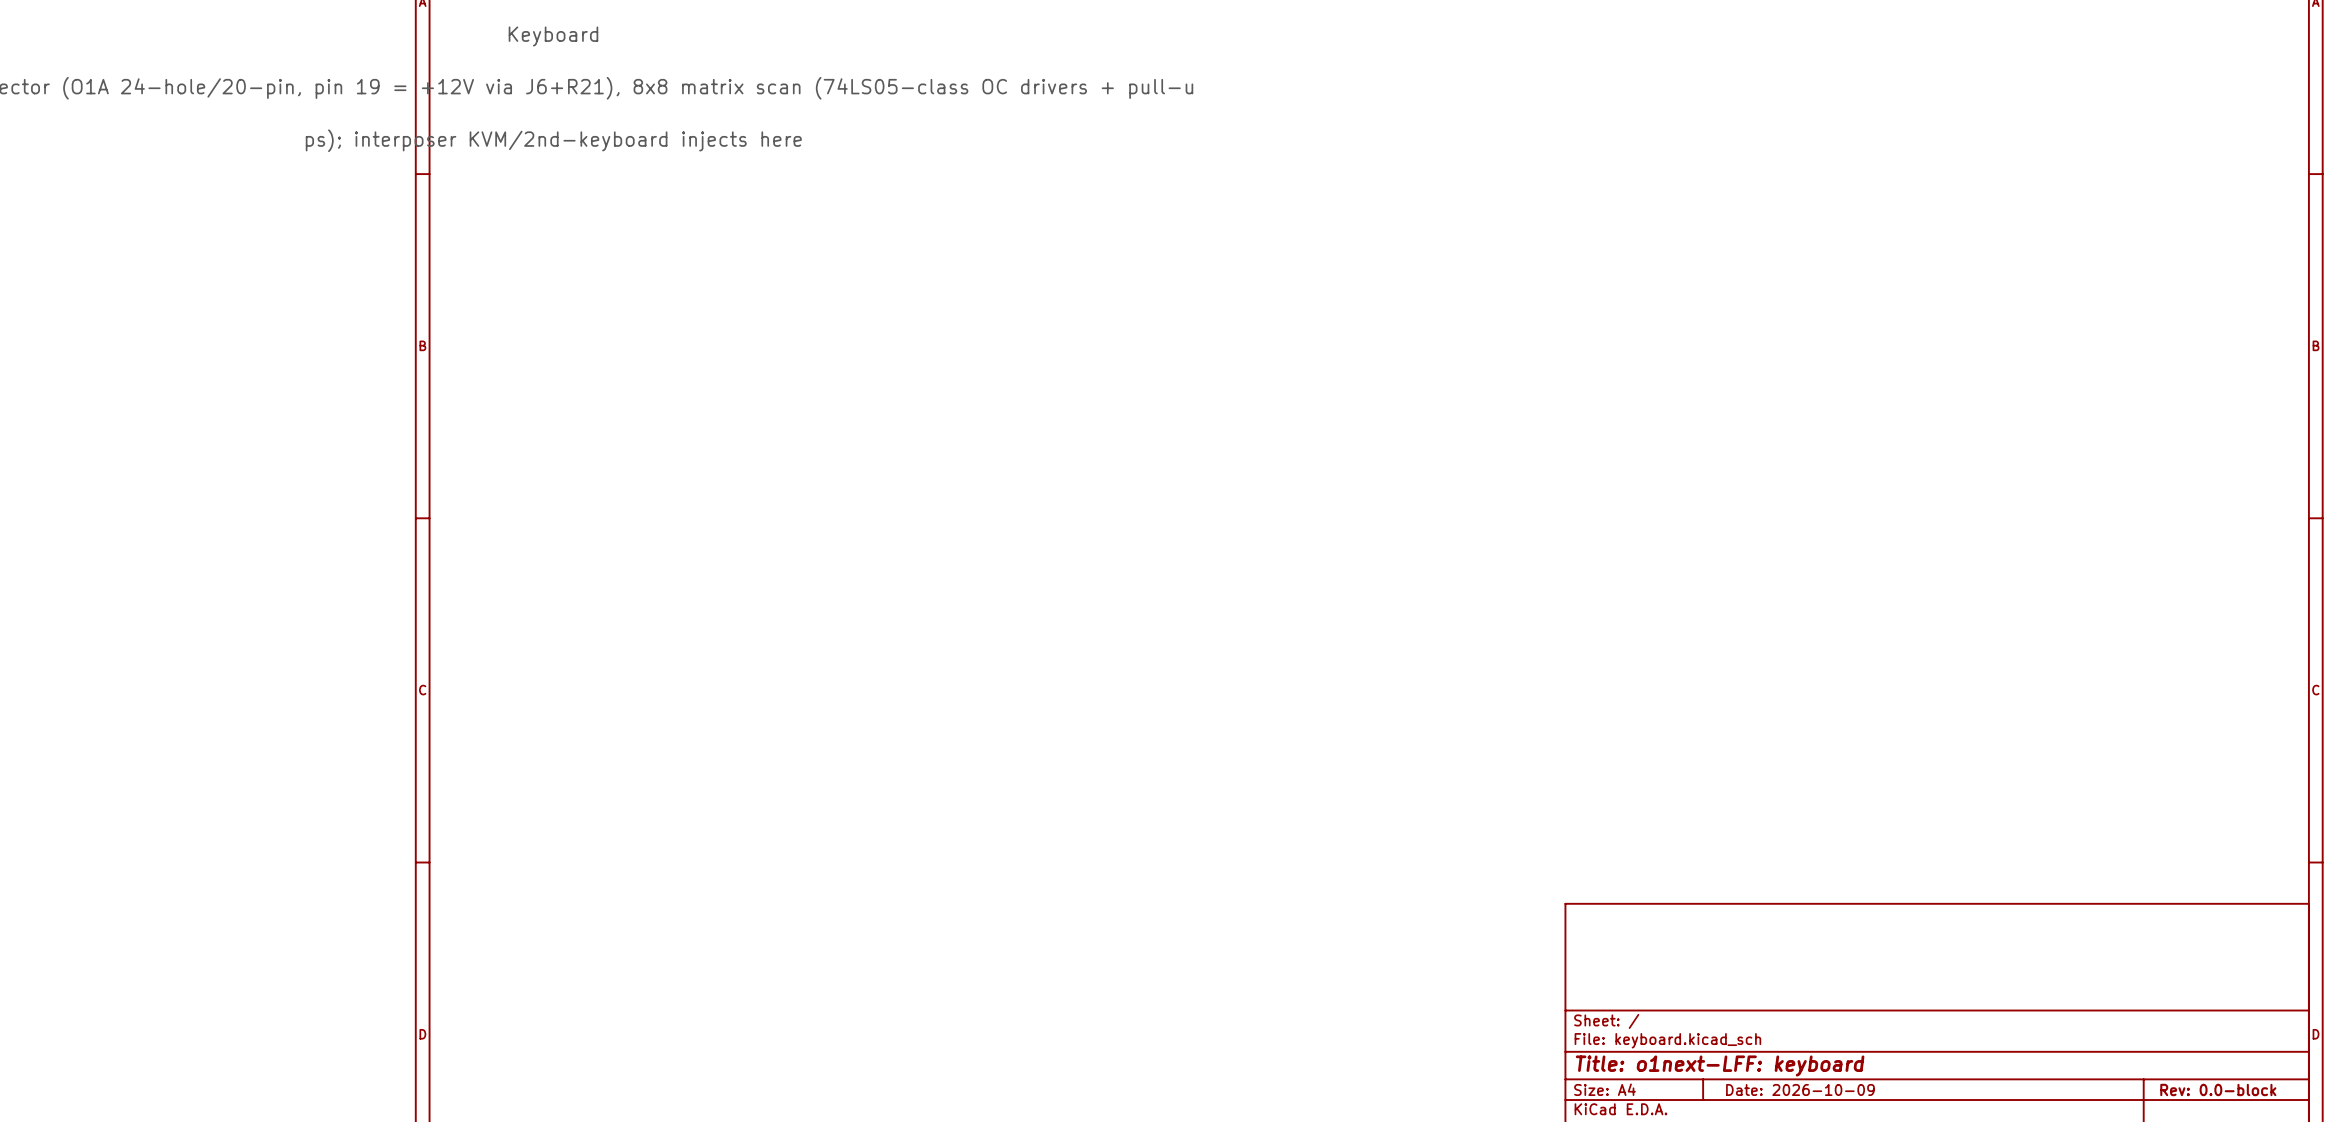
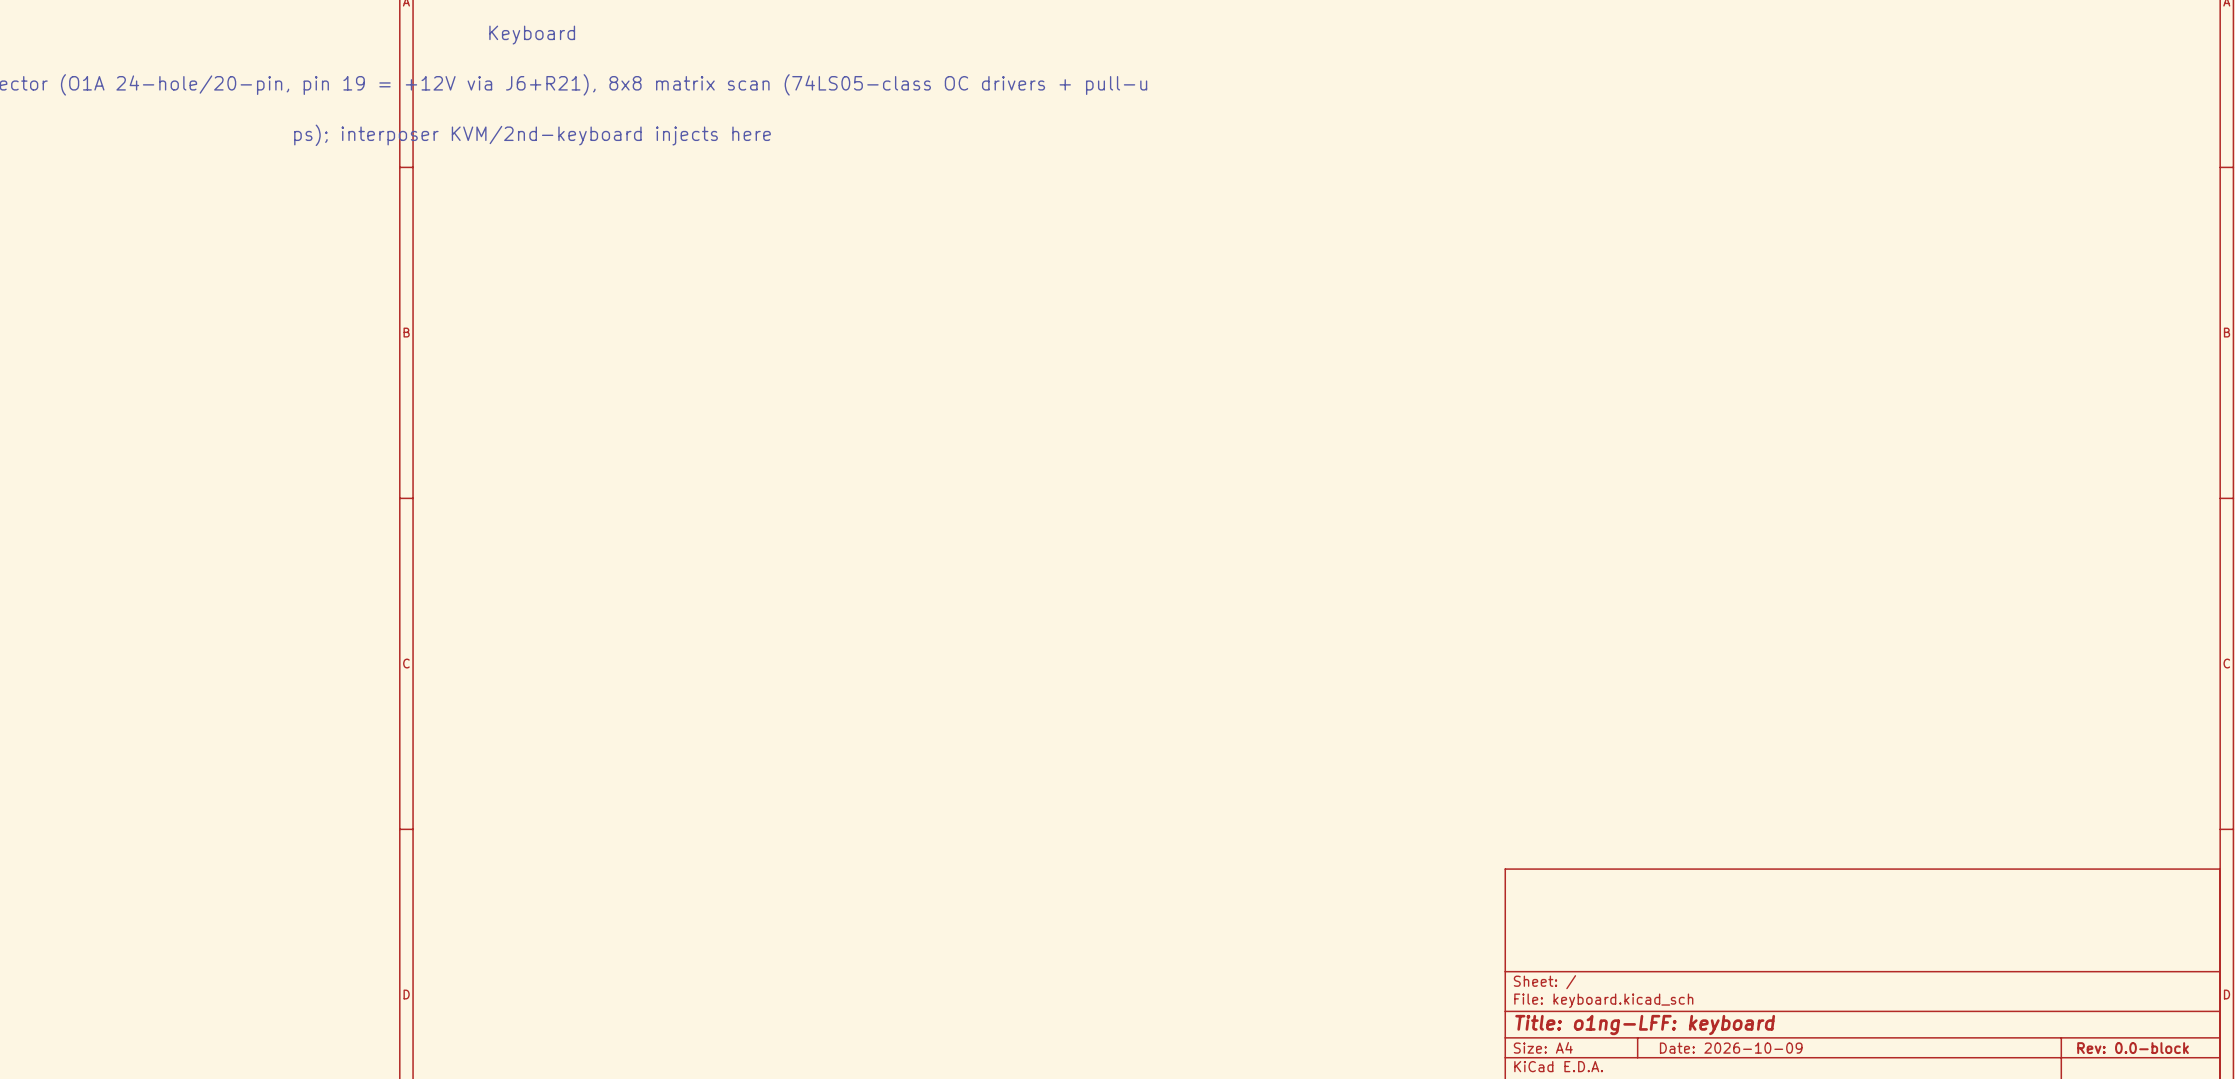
title block: Title: o1next-LFF: keyboard (1720, 1065) -> Title: o1ng-LFF: keyboard (1645, 1025)

